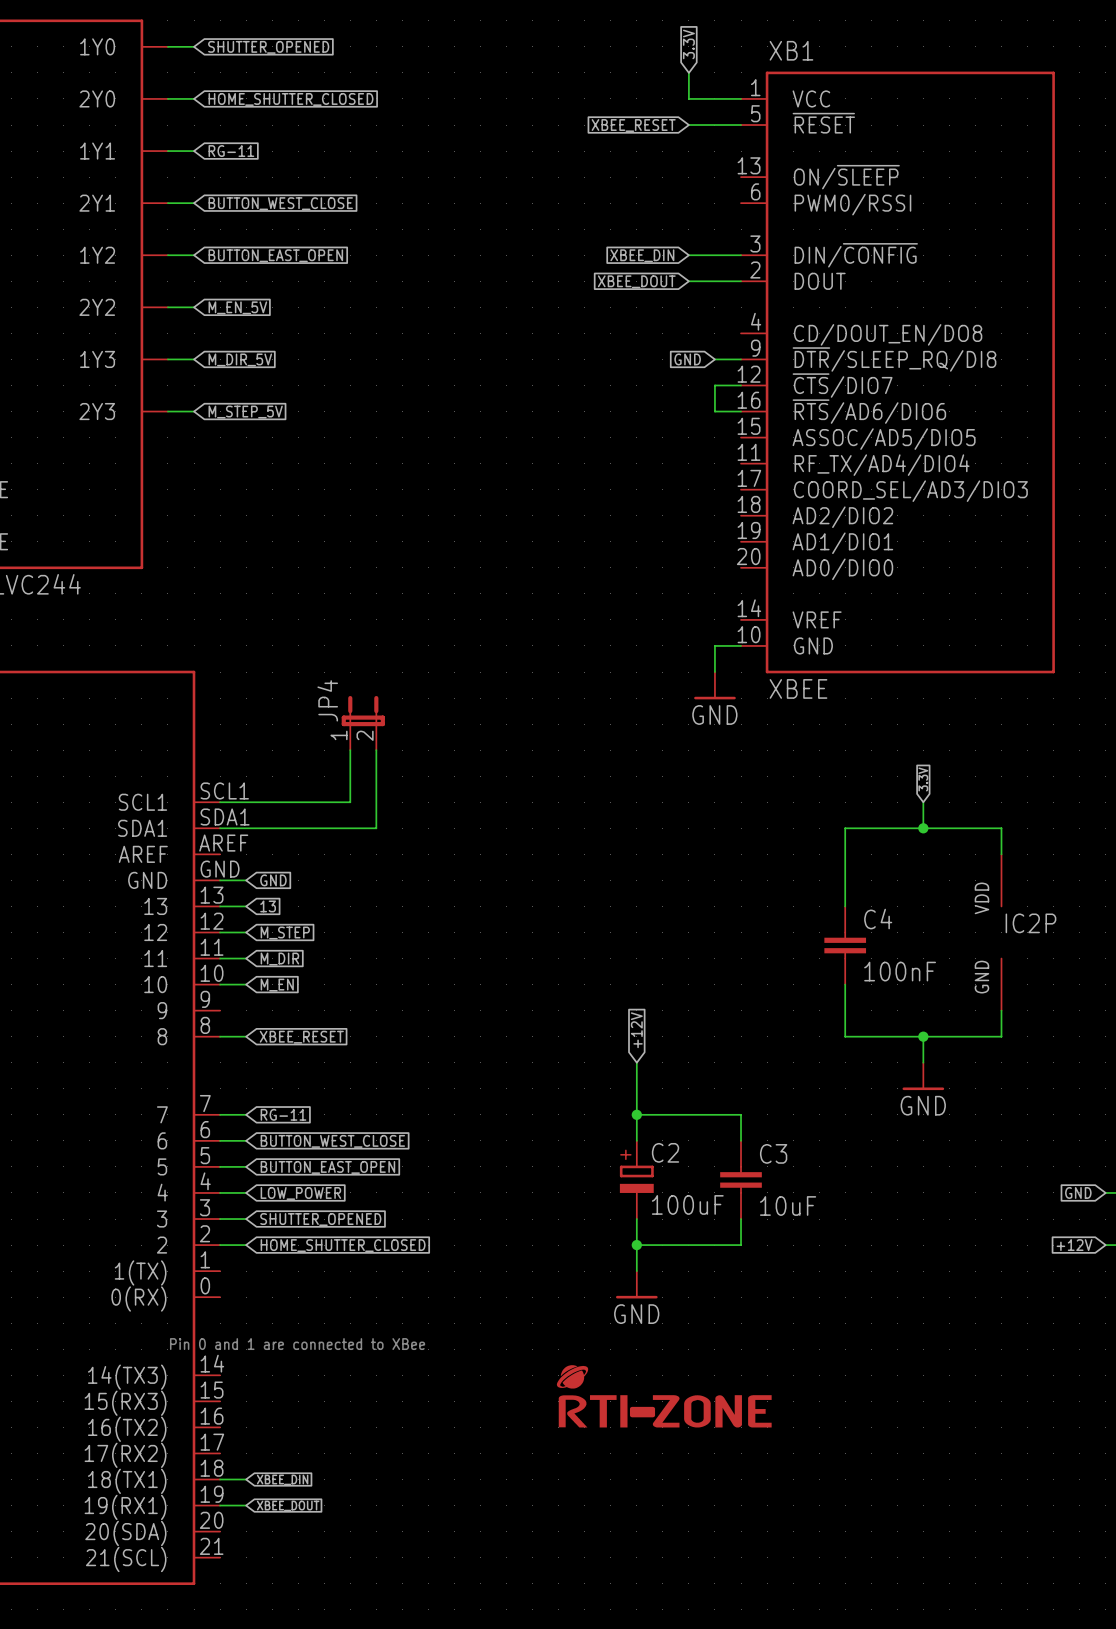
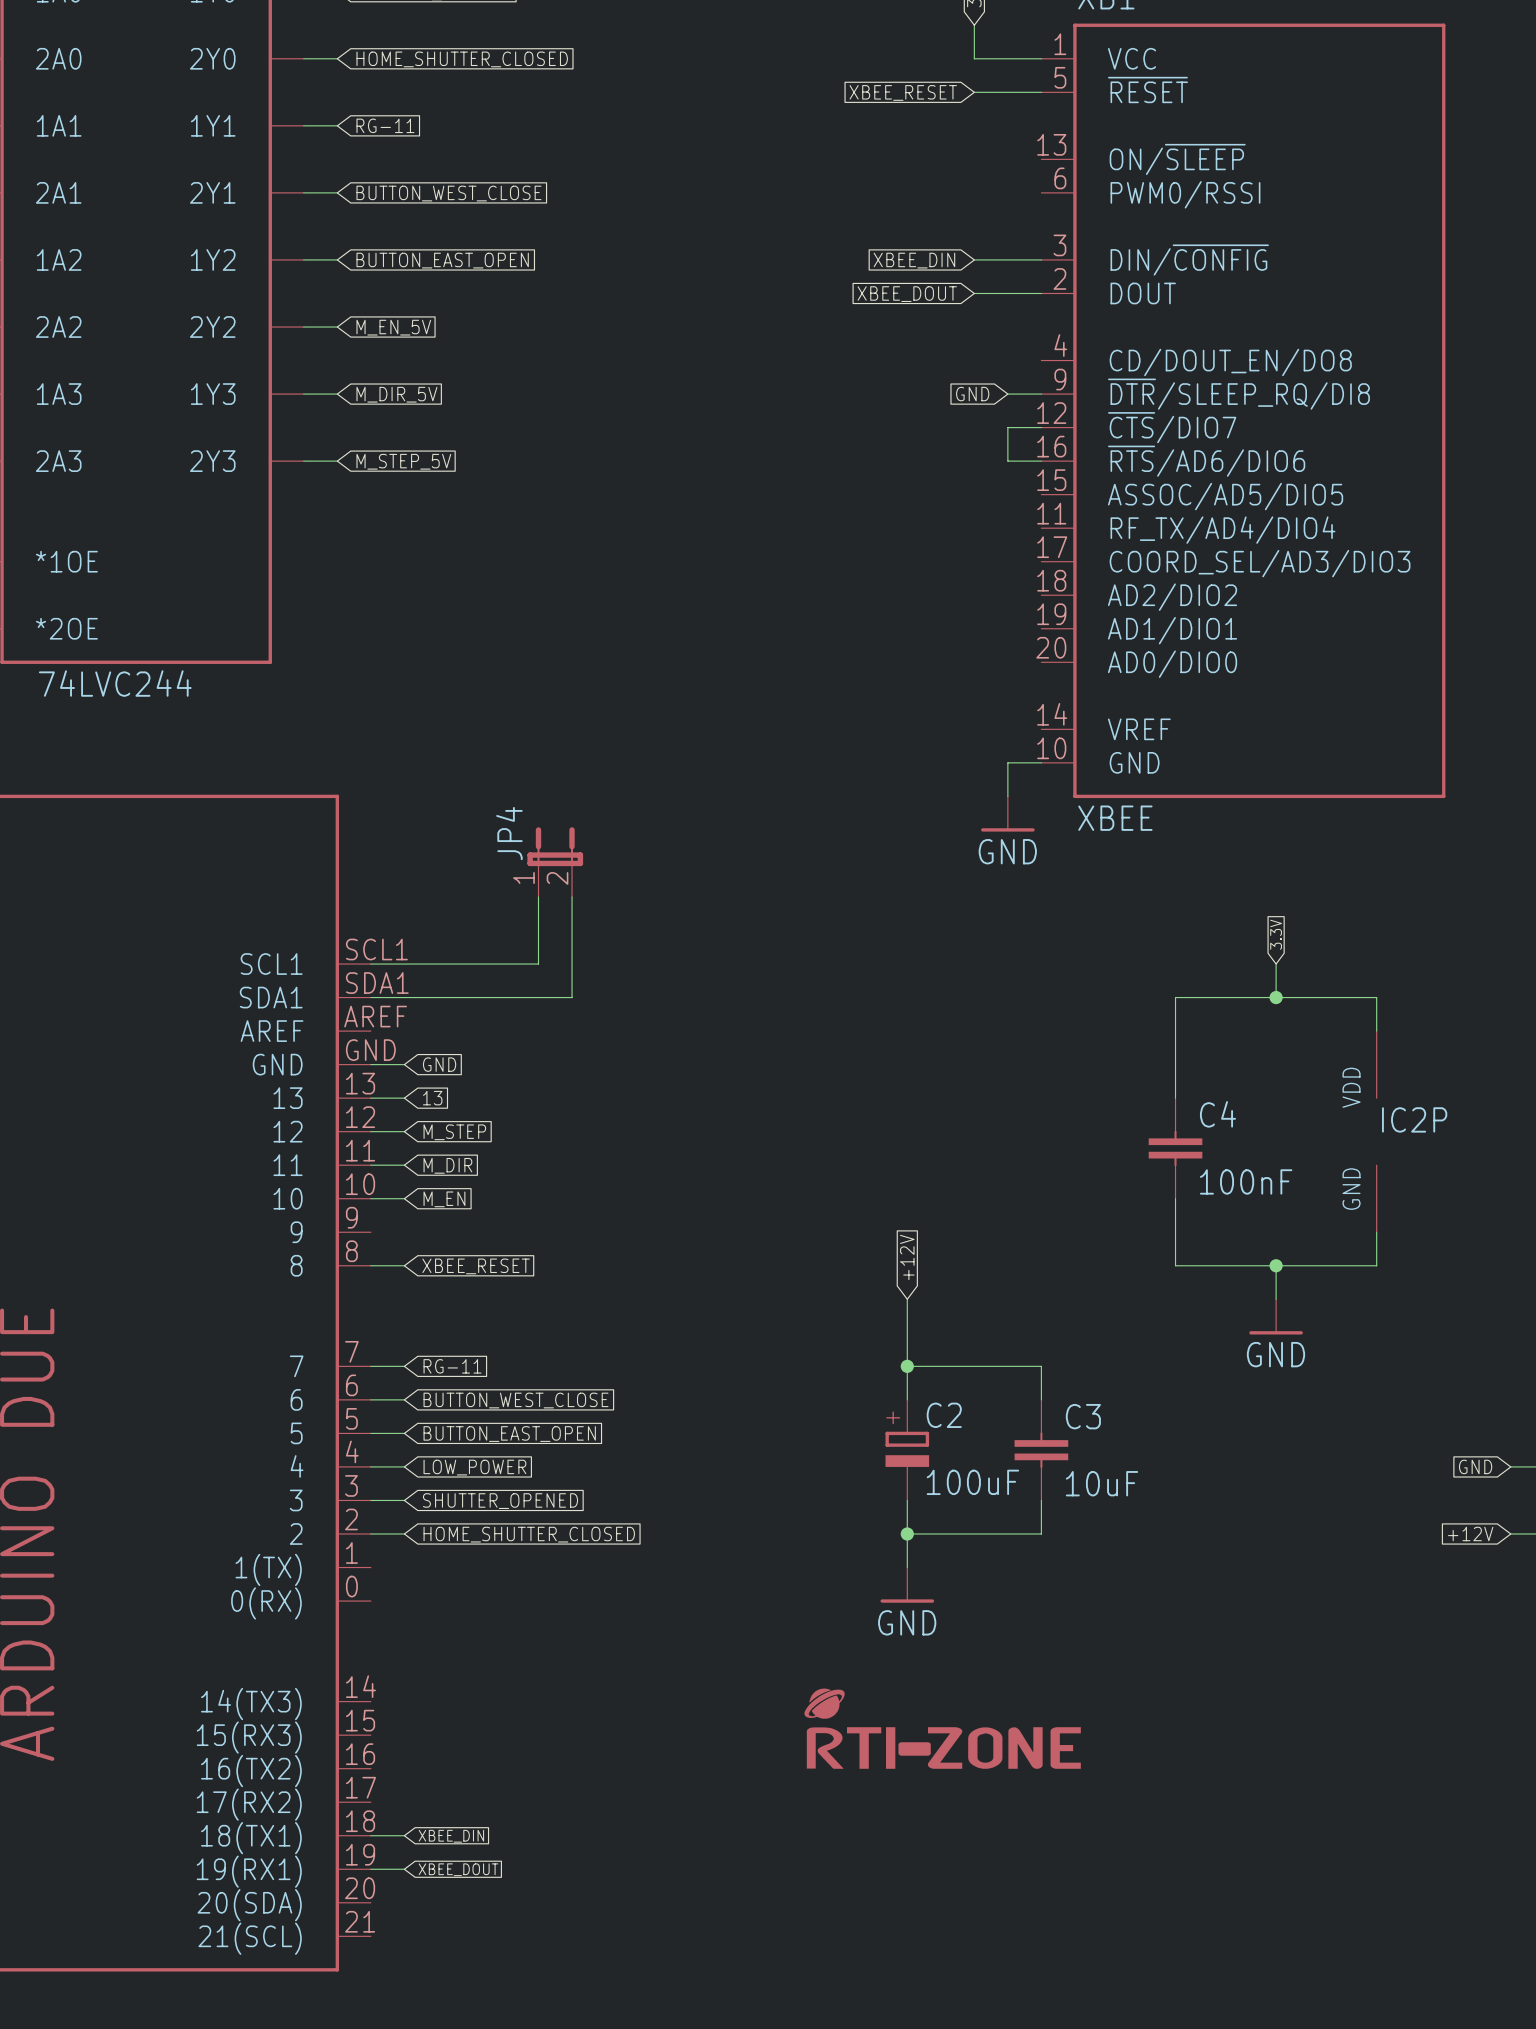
text: Pin 0 and 1 are connected to XBee (297, 1344) -> none

